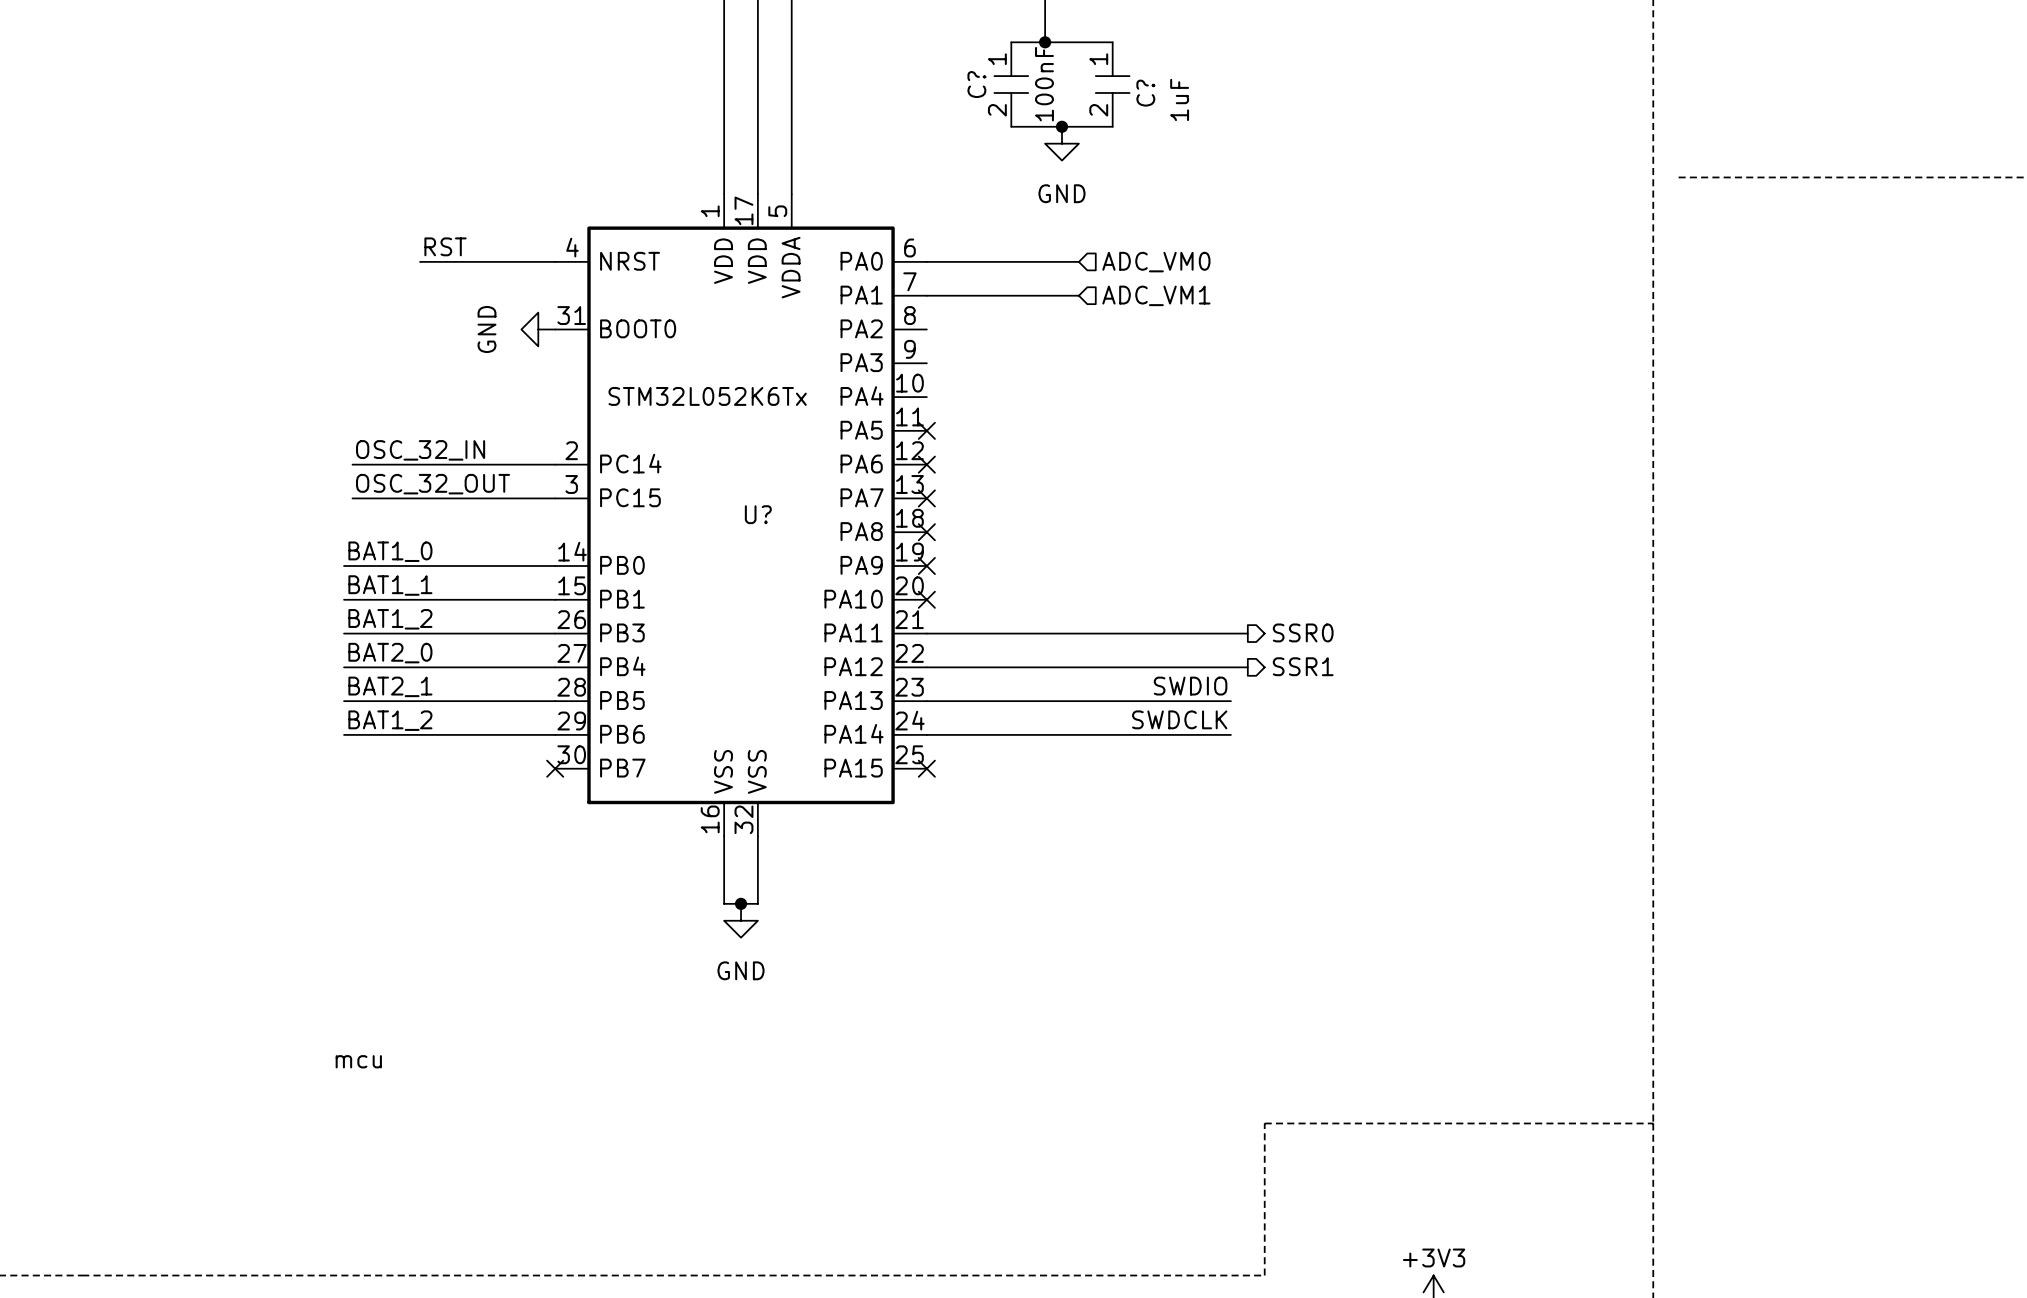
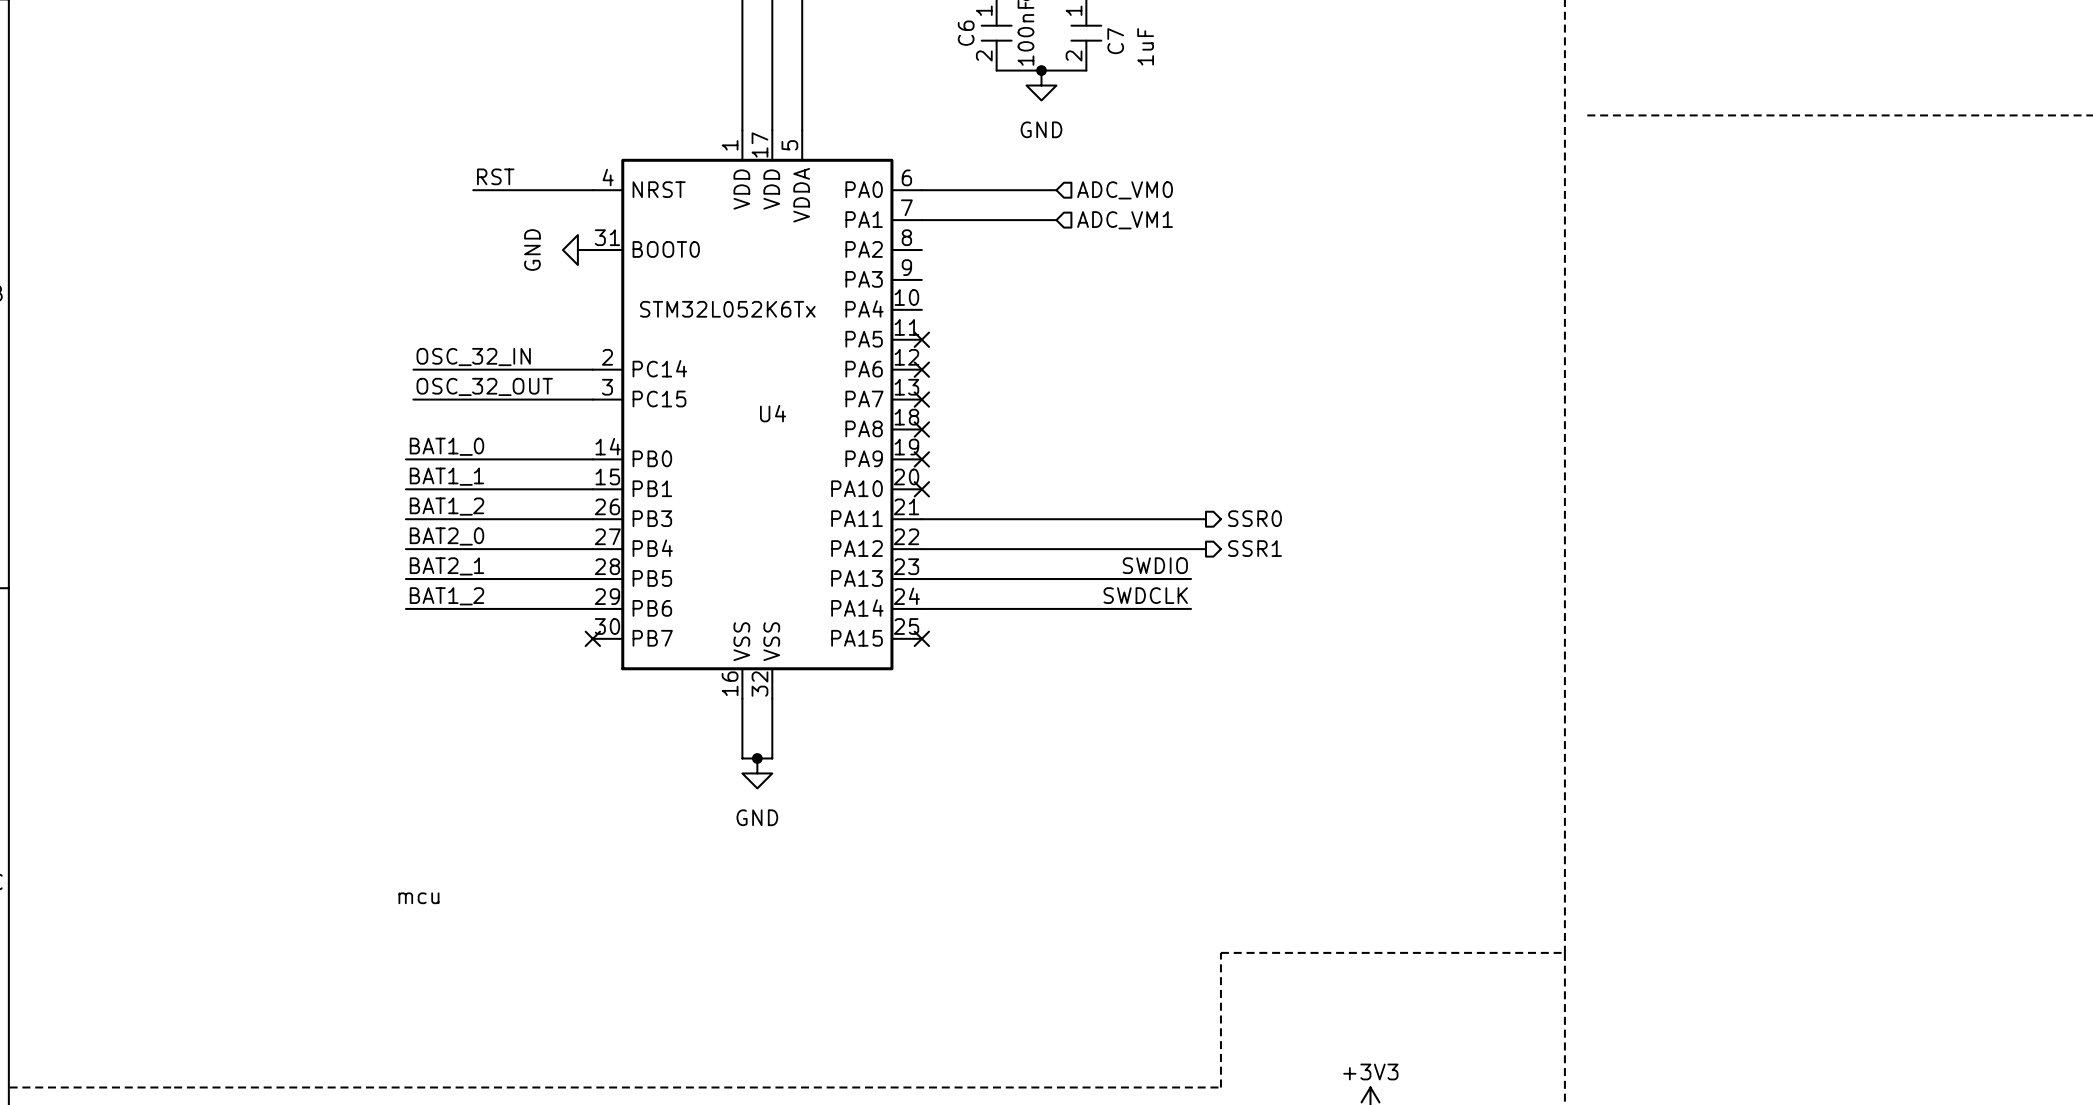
C? name: C? (976, 84) -> C6 (966, 33)
C? name: C? (1145, 93) -> C7 (1115, 41)
U? name: U? (758, 514) -> U4 (773, 413)

